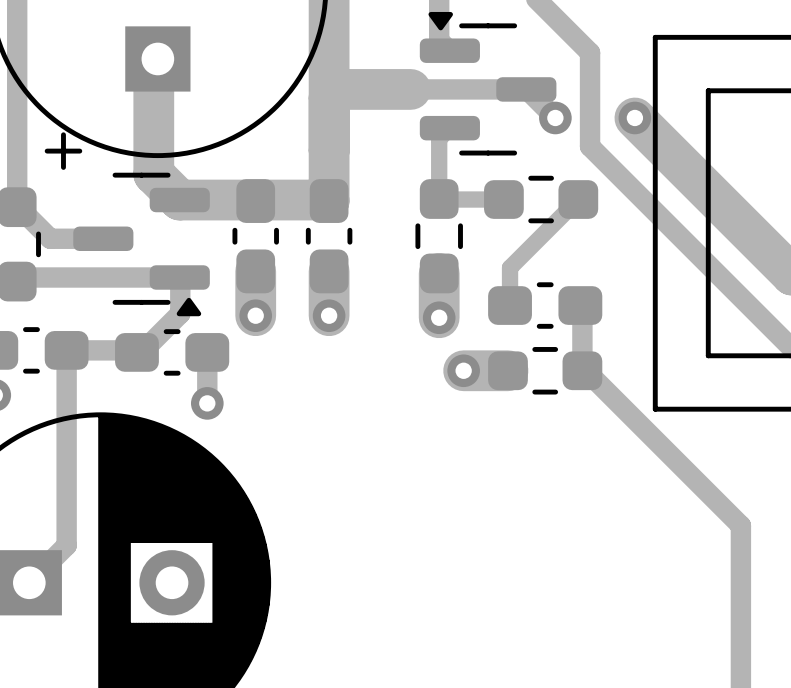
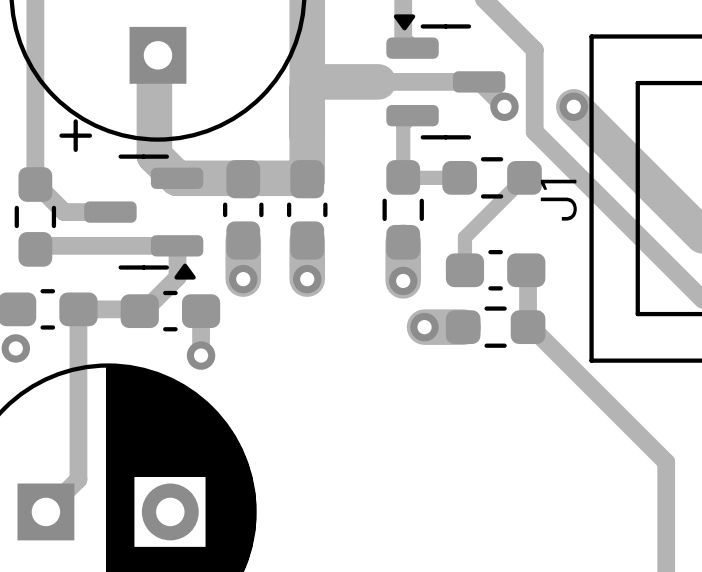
J1 name: none -> J1 (558, 200)

